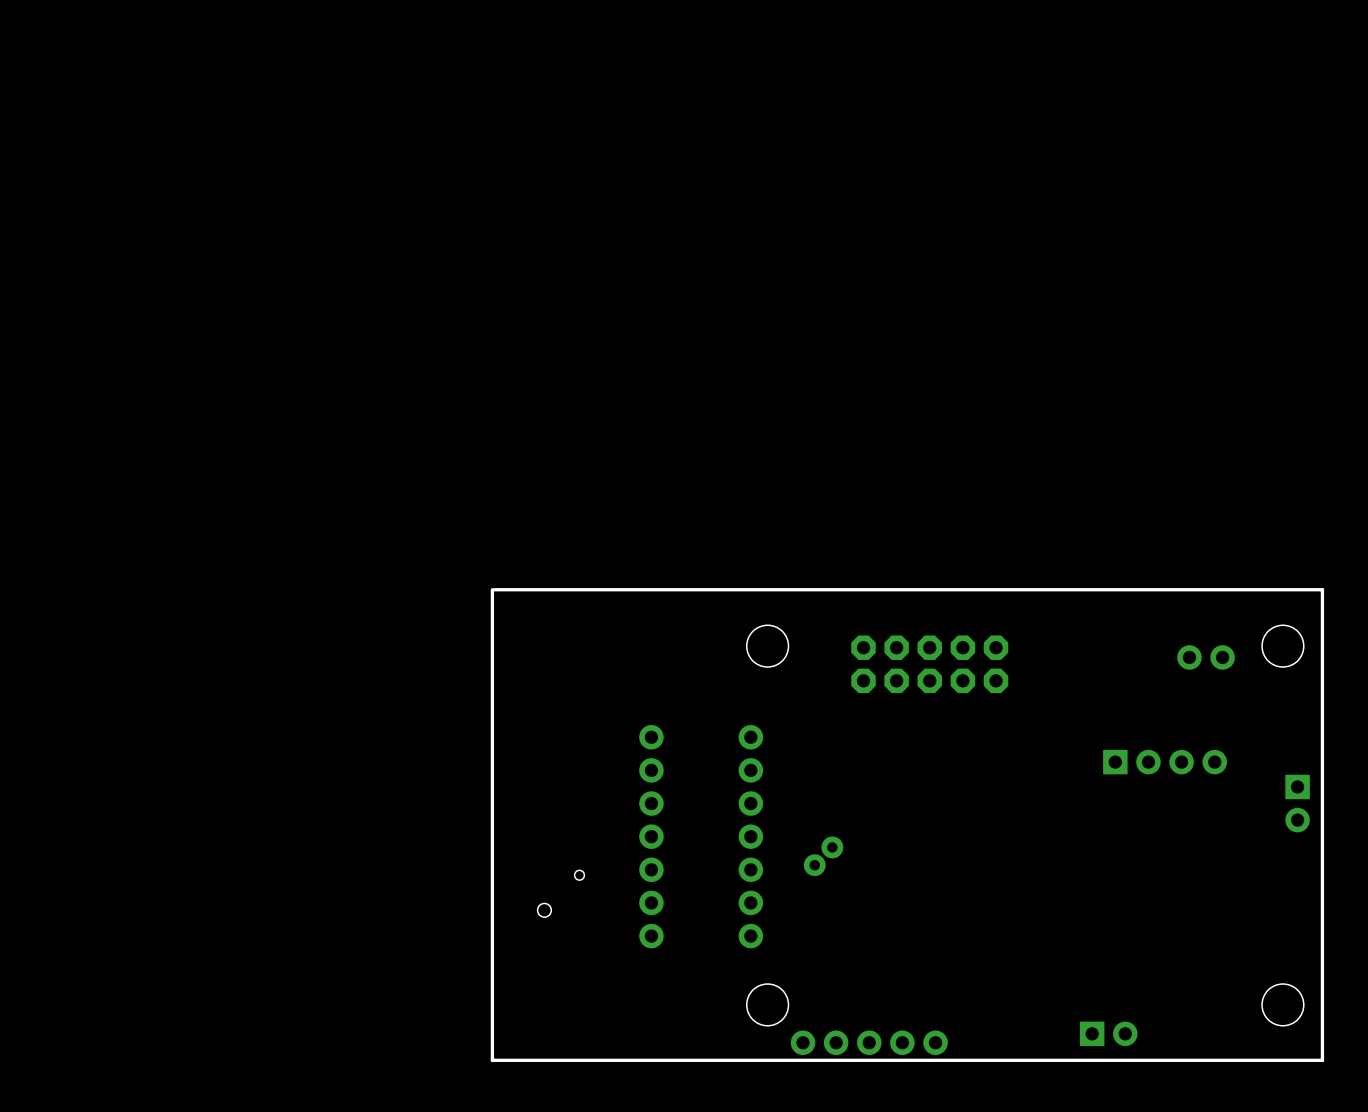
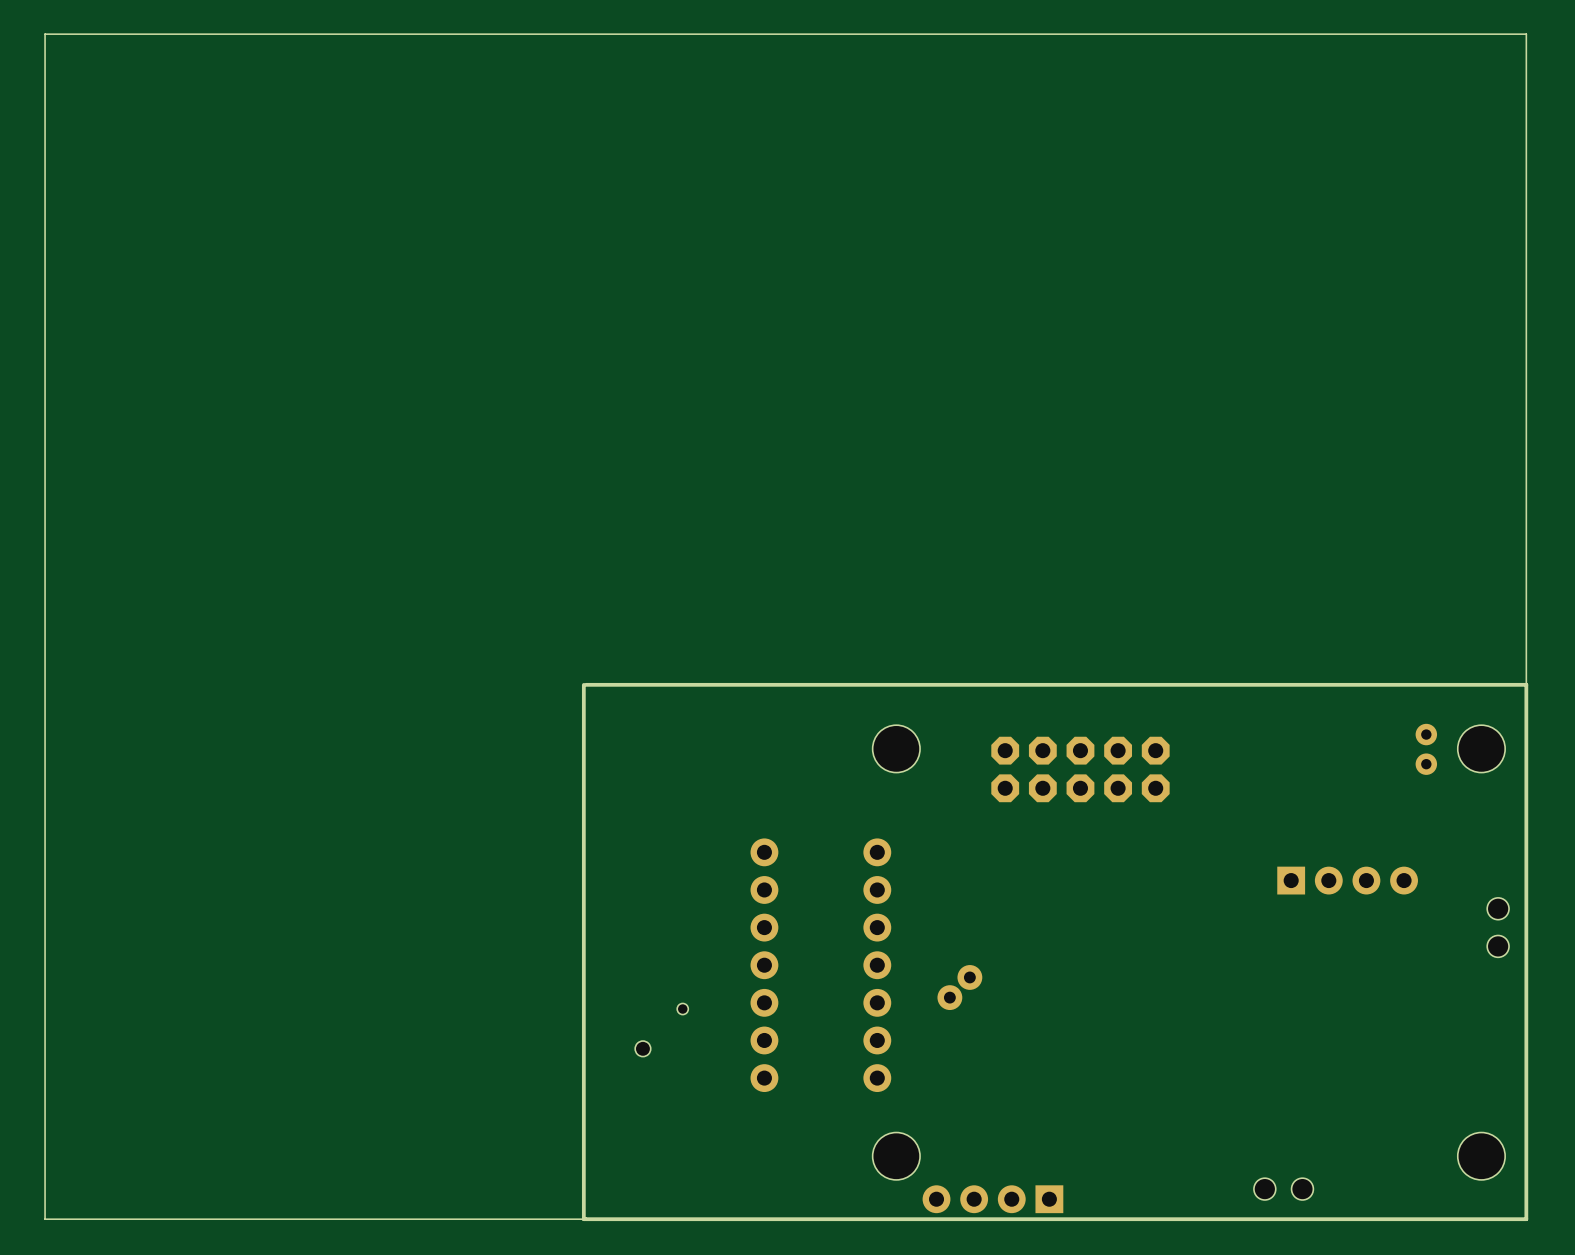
board edge: none -> (1526, 684) (1526, 34) (45, 34) (45, 1219) (585, 1219)
part: none -> (1426, 749)
part: (1206, 657) -> none
part footprint: [1285, 774, 1310, 833] -> [1487, 897, 1510, 958]
part footprint: [1079, 1021, 1138, 1047] -> [1253, 1178, 1314, 1201]
part: none -> (992, 1199)
part: (869, 1042) -> none

